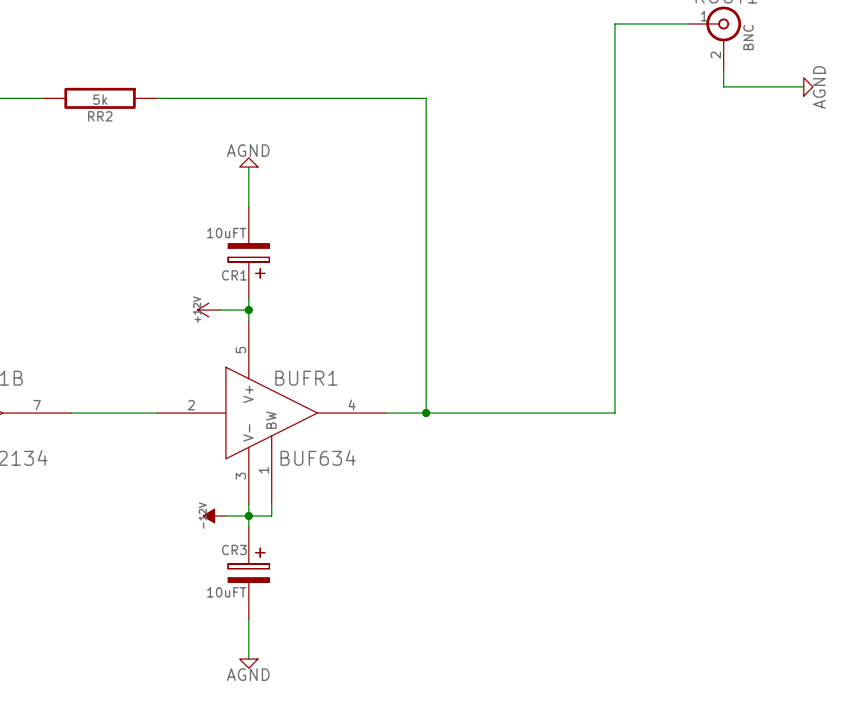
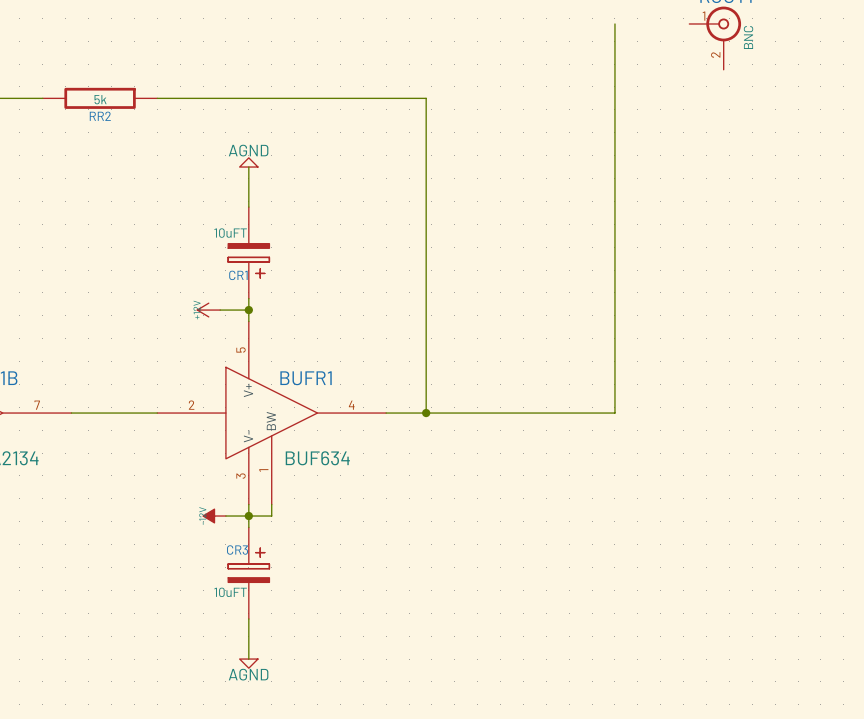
wire: (614, 23) (689, 23) -> none
wire: (723, 69) (723, 86) (803, 86) -> none
power symbol: AGND (808, 86) -> none

